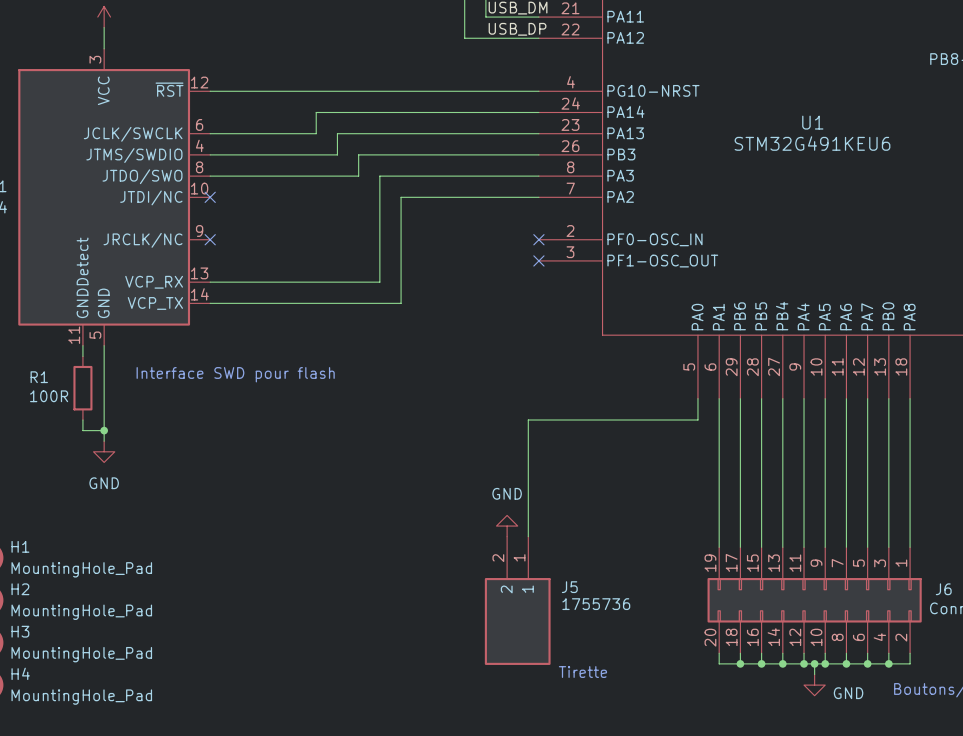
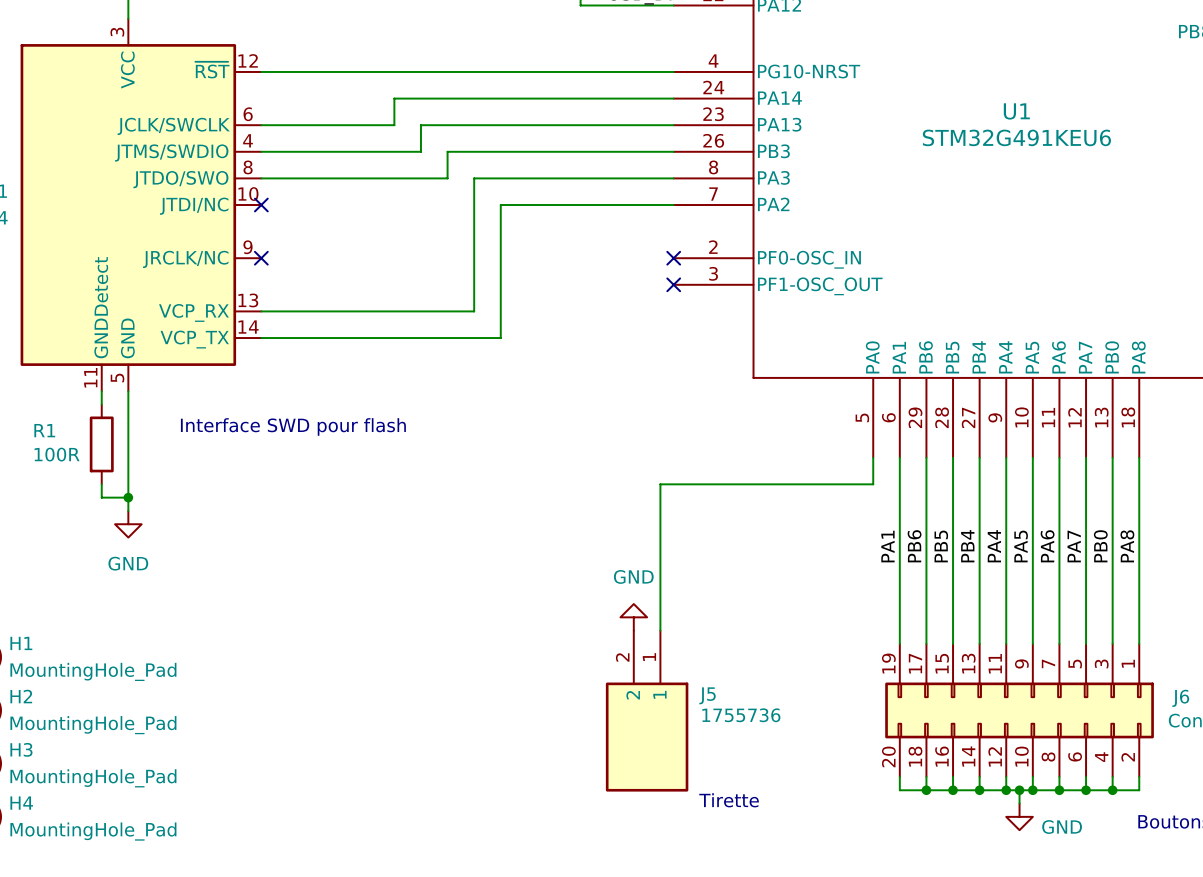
label: none -> PB6 (914, 546)
label: none -> PB5 (941, 546)
label: none -> PB4 (967, 546)
label: none -> PB0 (1100, 546)
label: none -> PA1 (887, 546)
label: none -> PA4 (994, 546)
label: none -> PA5 (1021, 546)
label: none -> PA6 (1047, 546)
label: none -> PA7 (1074, 546)
label: none -> PA8 (1127, 546)

